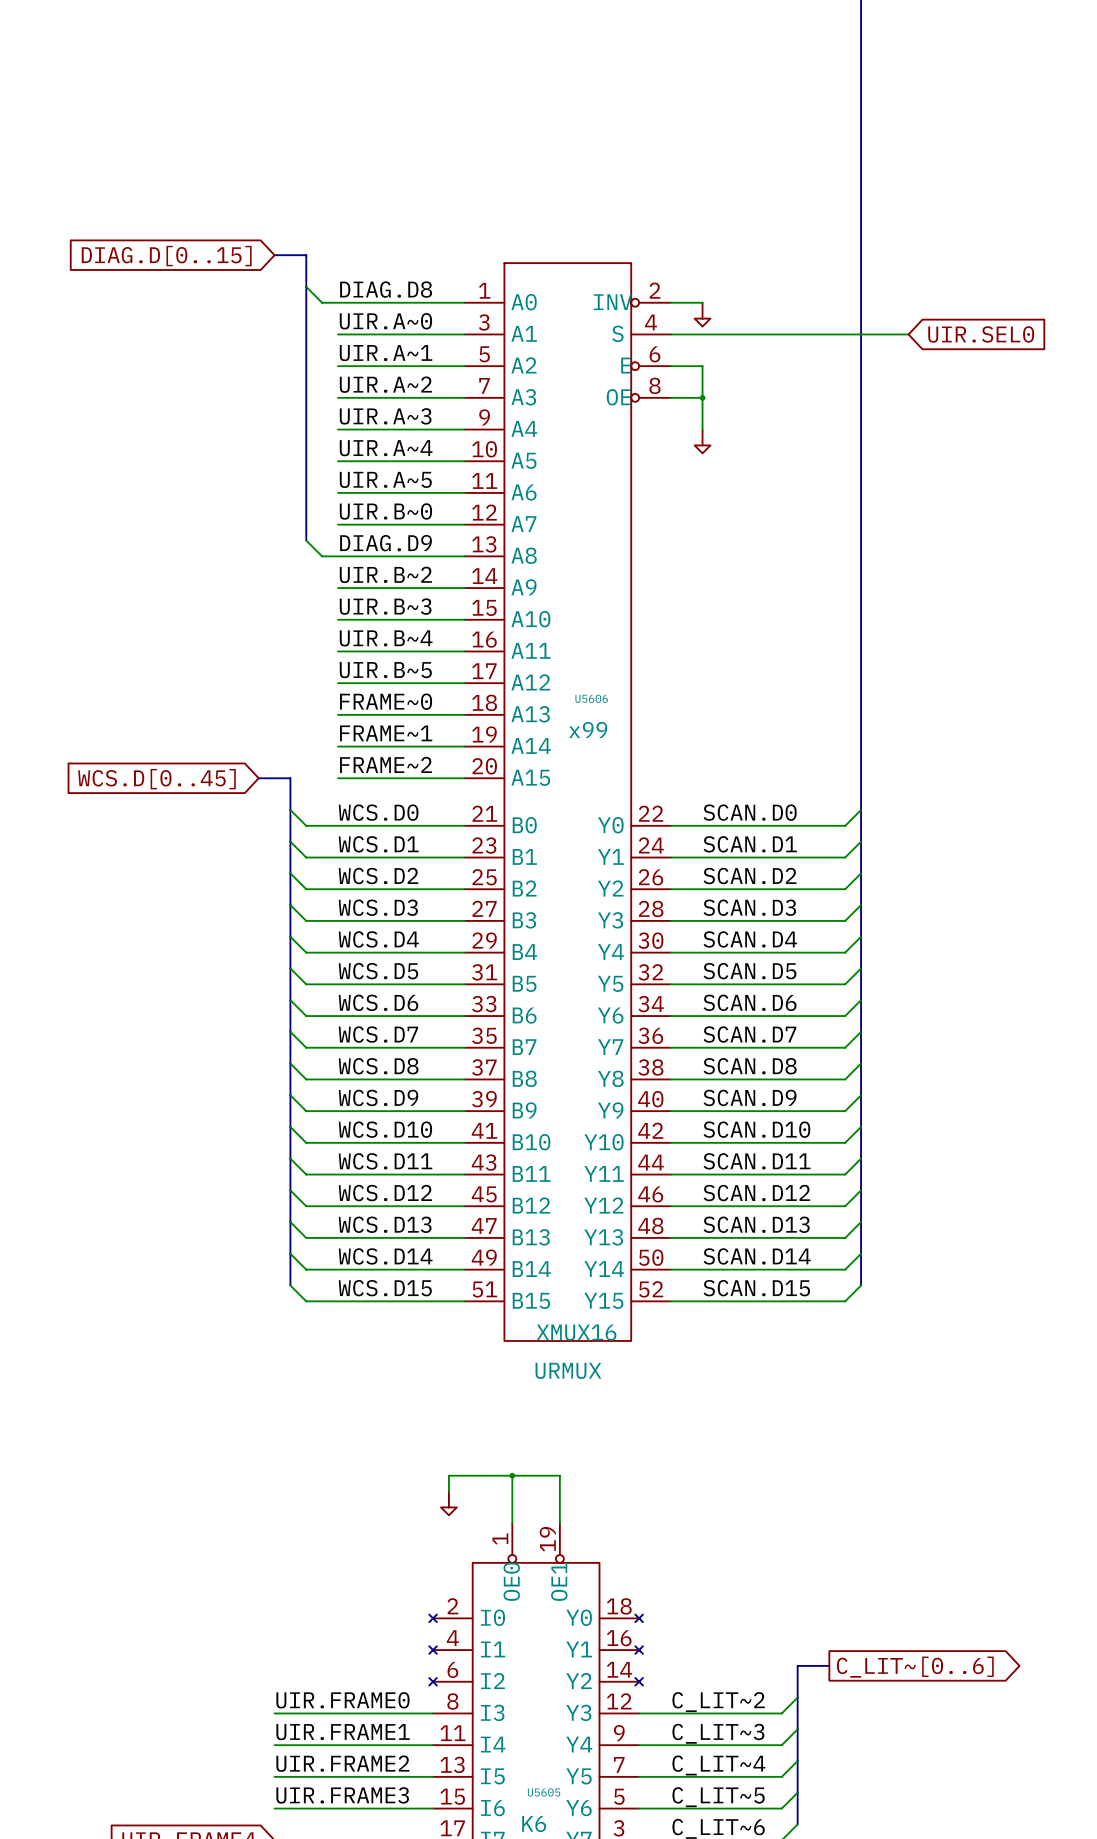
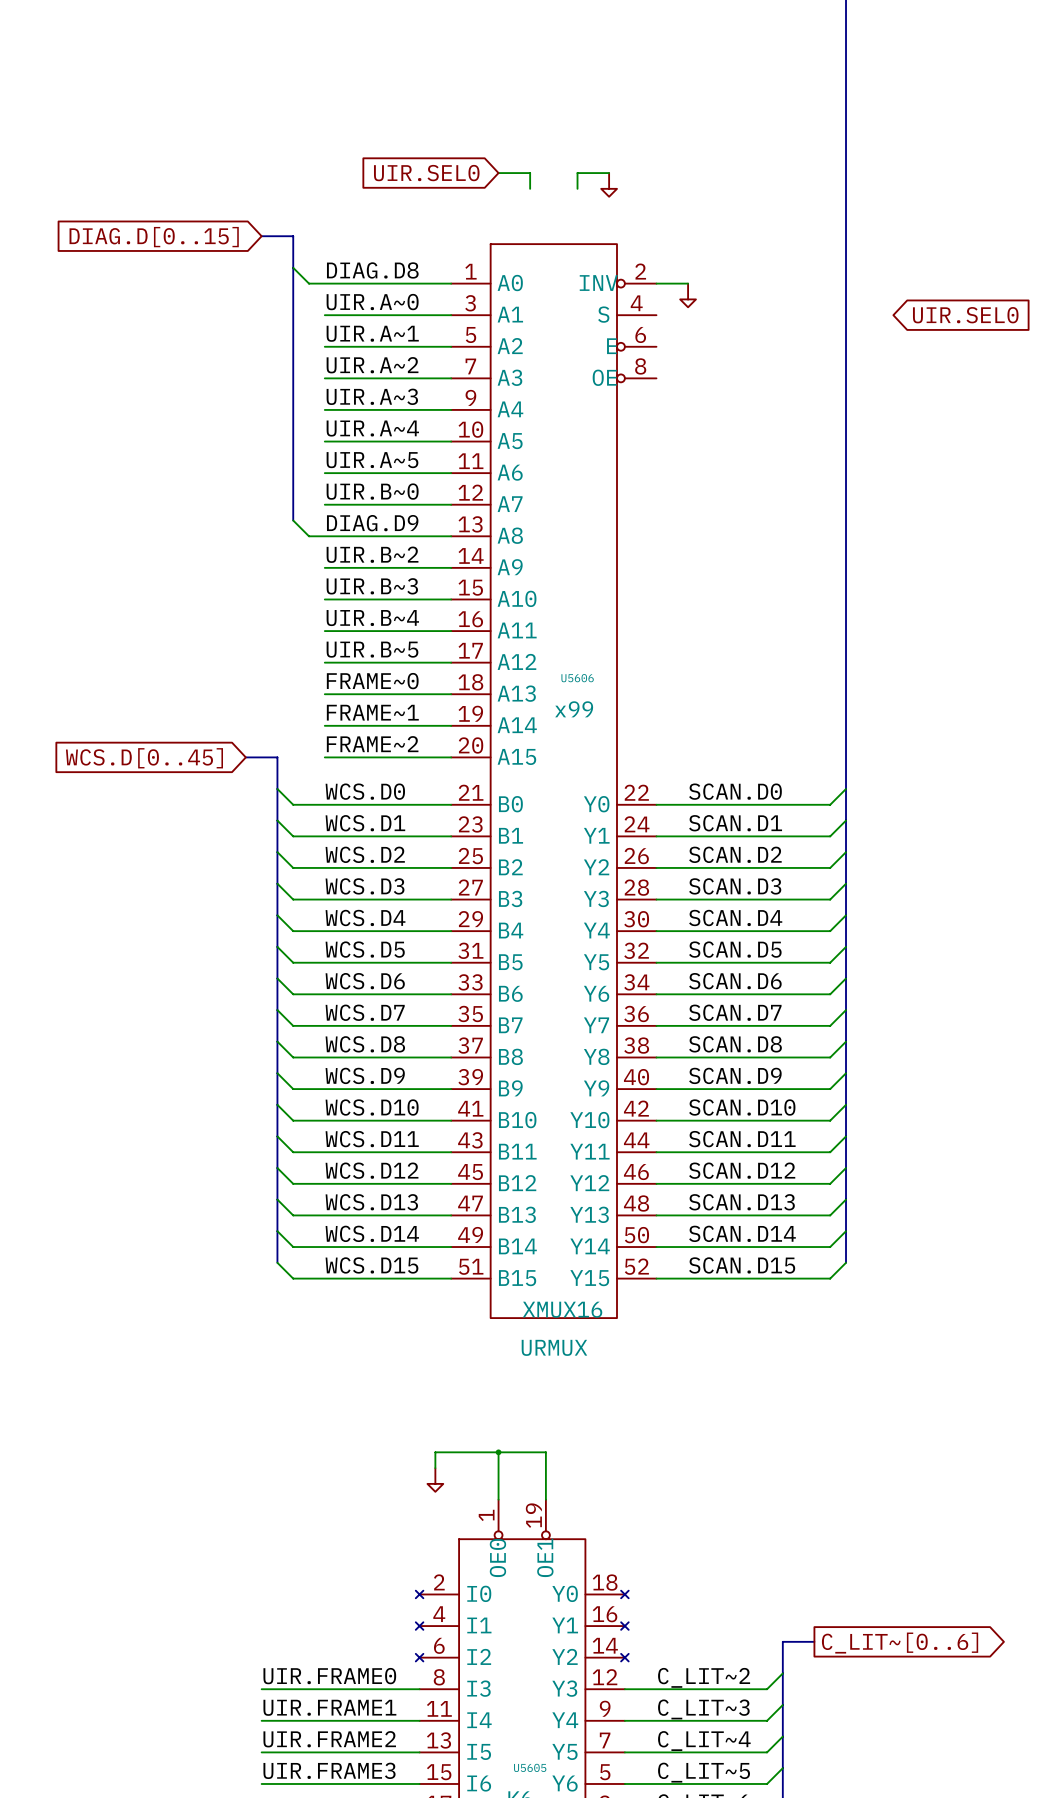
global label: none -> UIR.SEL0 (426, 173)
wire: none -> (498, 173) (530, 173) (530, 188)
wire: none -> (609, 173) (577, 173) (577, 188)
power symbol: none -> (609, 185)
wire: (670, 334) (908, 334) -> none
wire: (670, 366) (702, 366) (702, 429) -> none
wire: (670, 397) (702, 397) -> none
junction: (702, 397) -> none
power symbol: (702, 441) -> none

